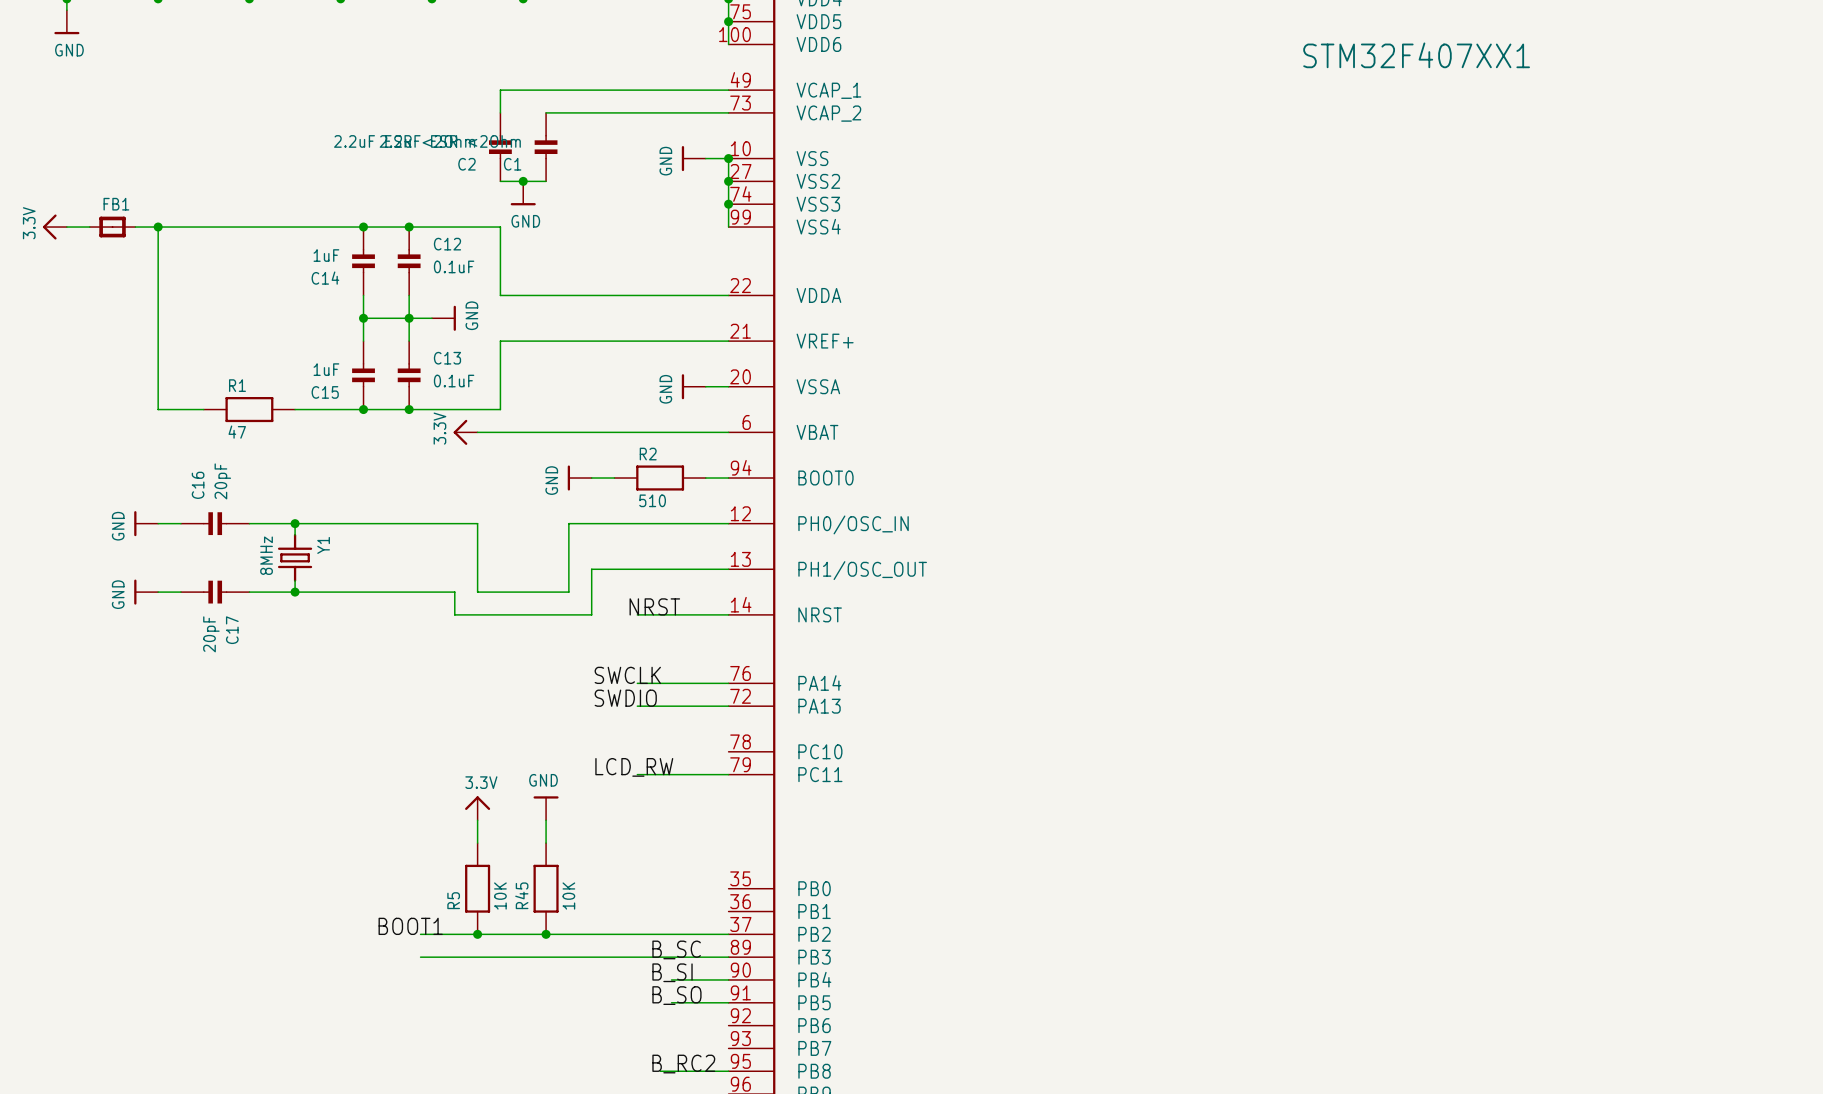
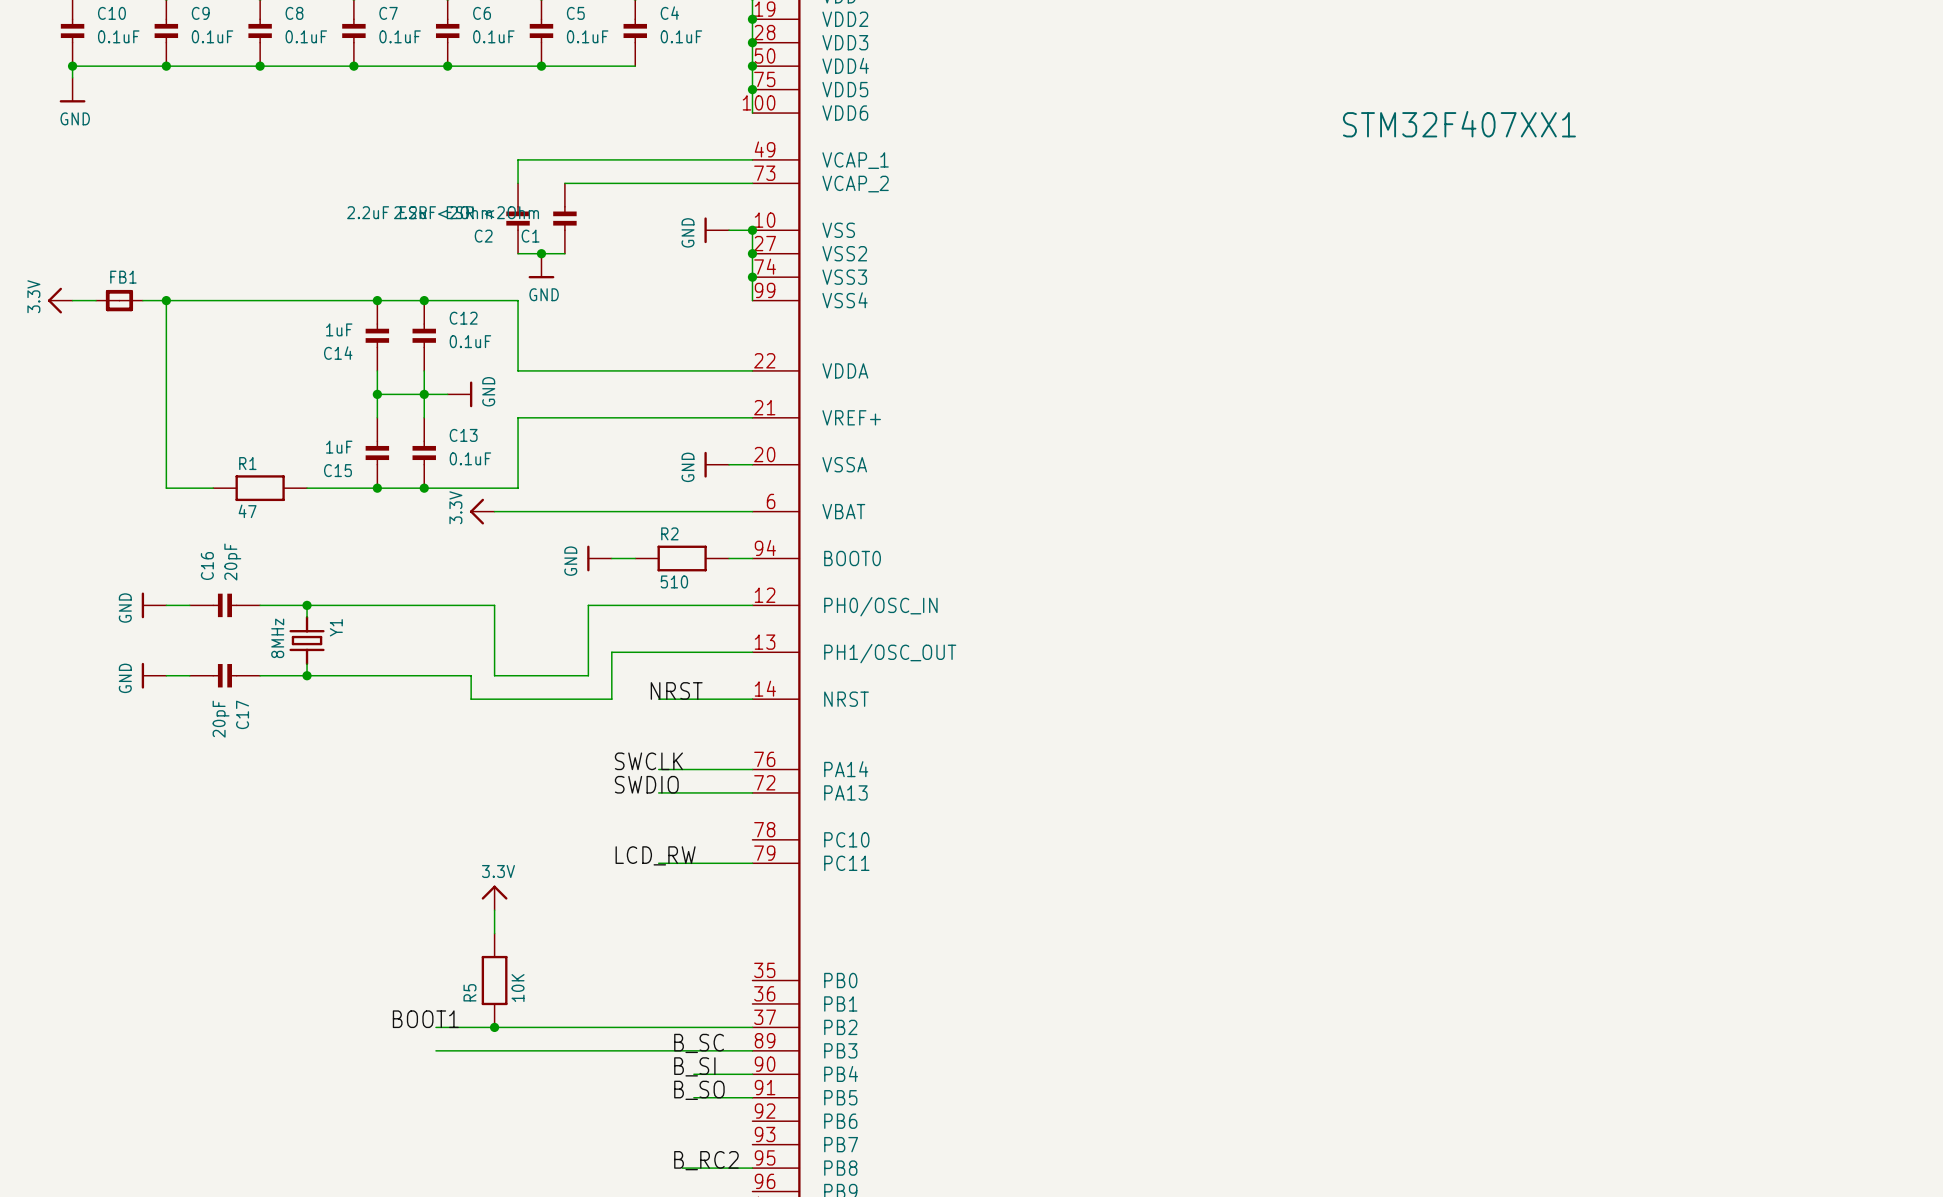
power symbol: GND (546, 808) -> none
wire: (546, 820) (546, 843) -> none
R45: 10K (546, 888) -> none
junction: (546, 934) -> none

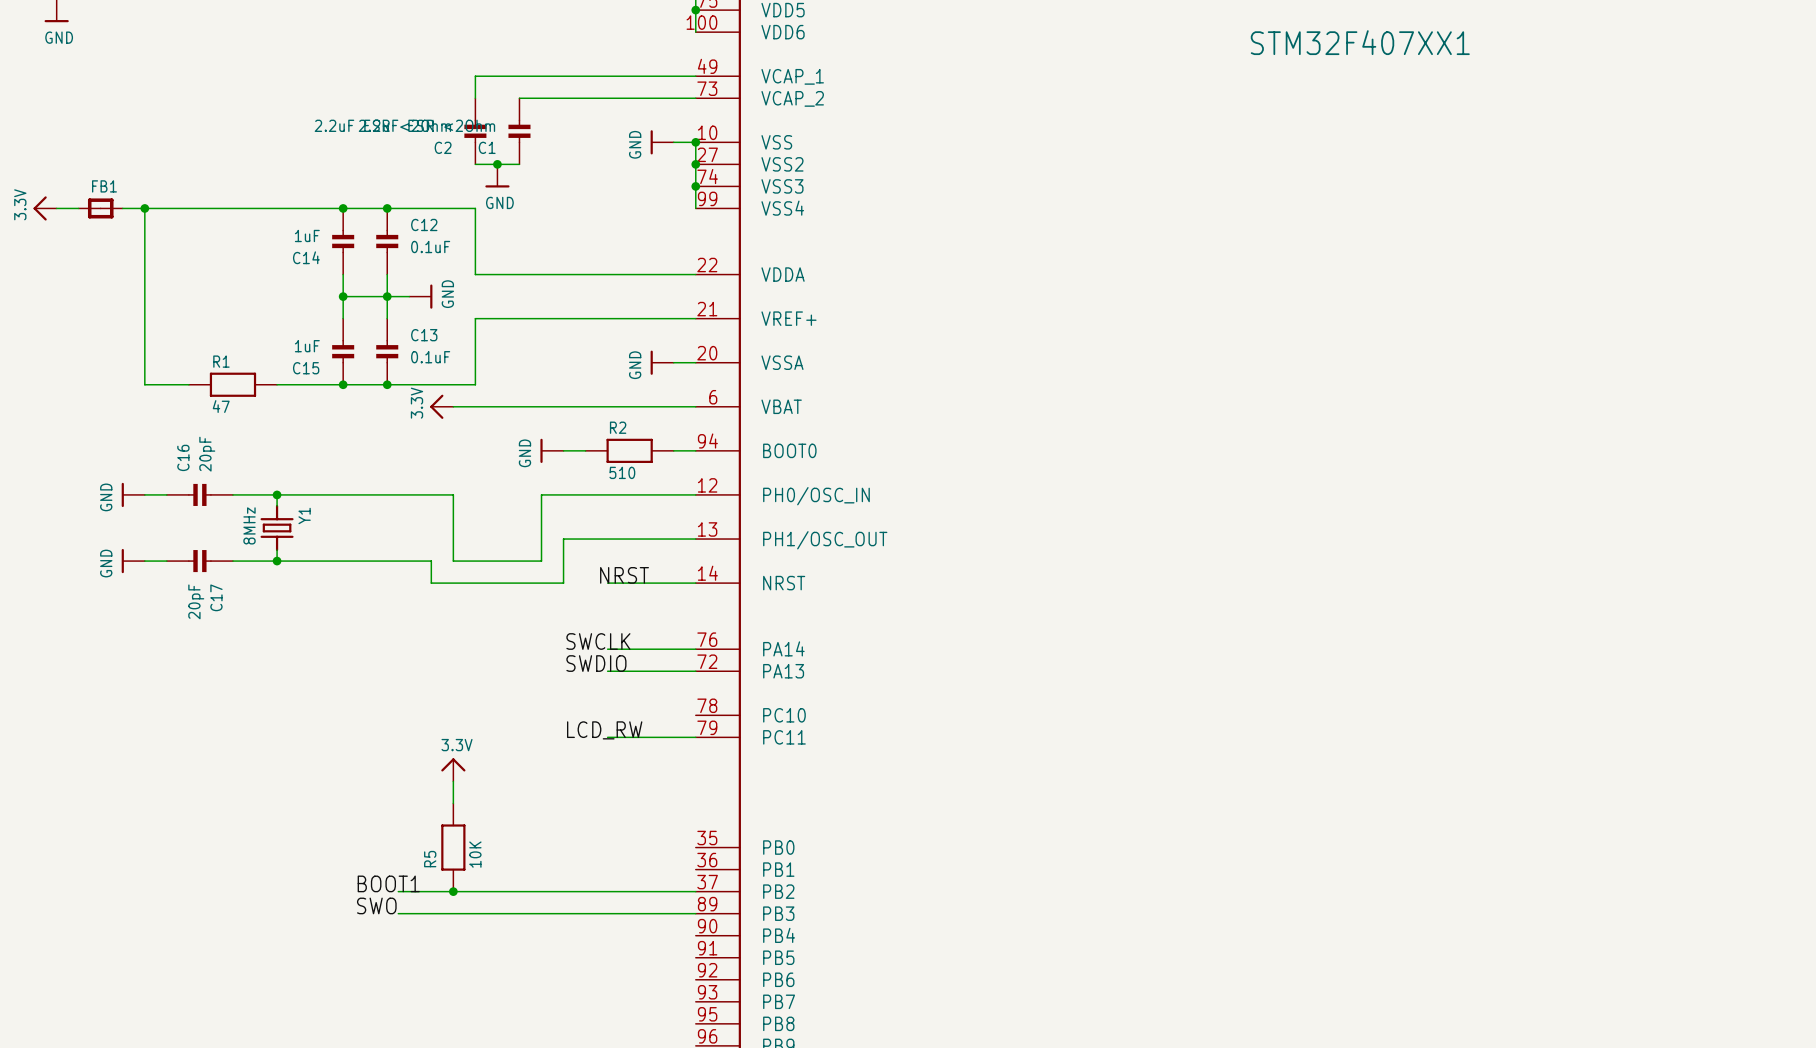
label: none -> SWO (376, 905)
label: B_SC (699, 1043) -> none
label: B_SI (694, 1066) -> none
wire: (693, 1074) (752, 1074) -> none
label: B_SO (699, 1090) -> none
wire: (693, 1097) (752, 1097) -> none
label: B_RC2 (706, 1160) -> none
wire: (682, 1168) (752, 1168) -> none

